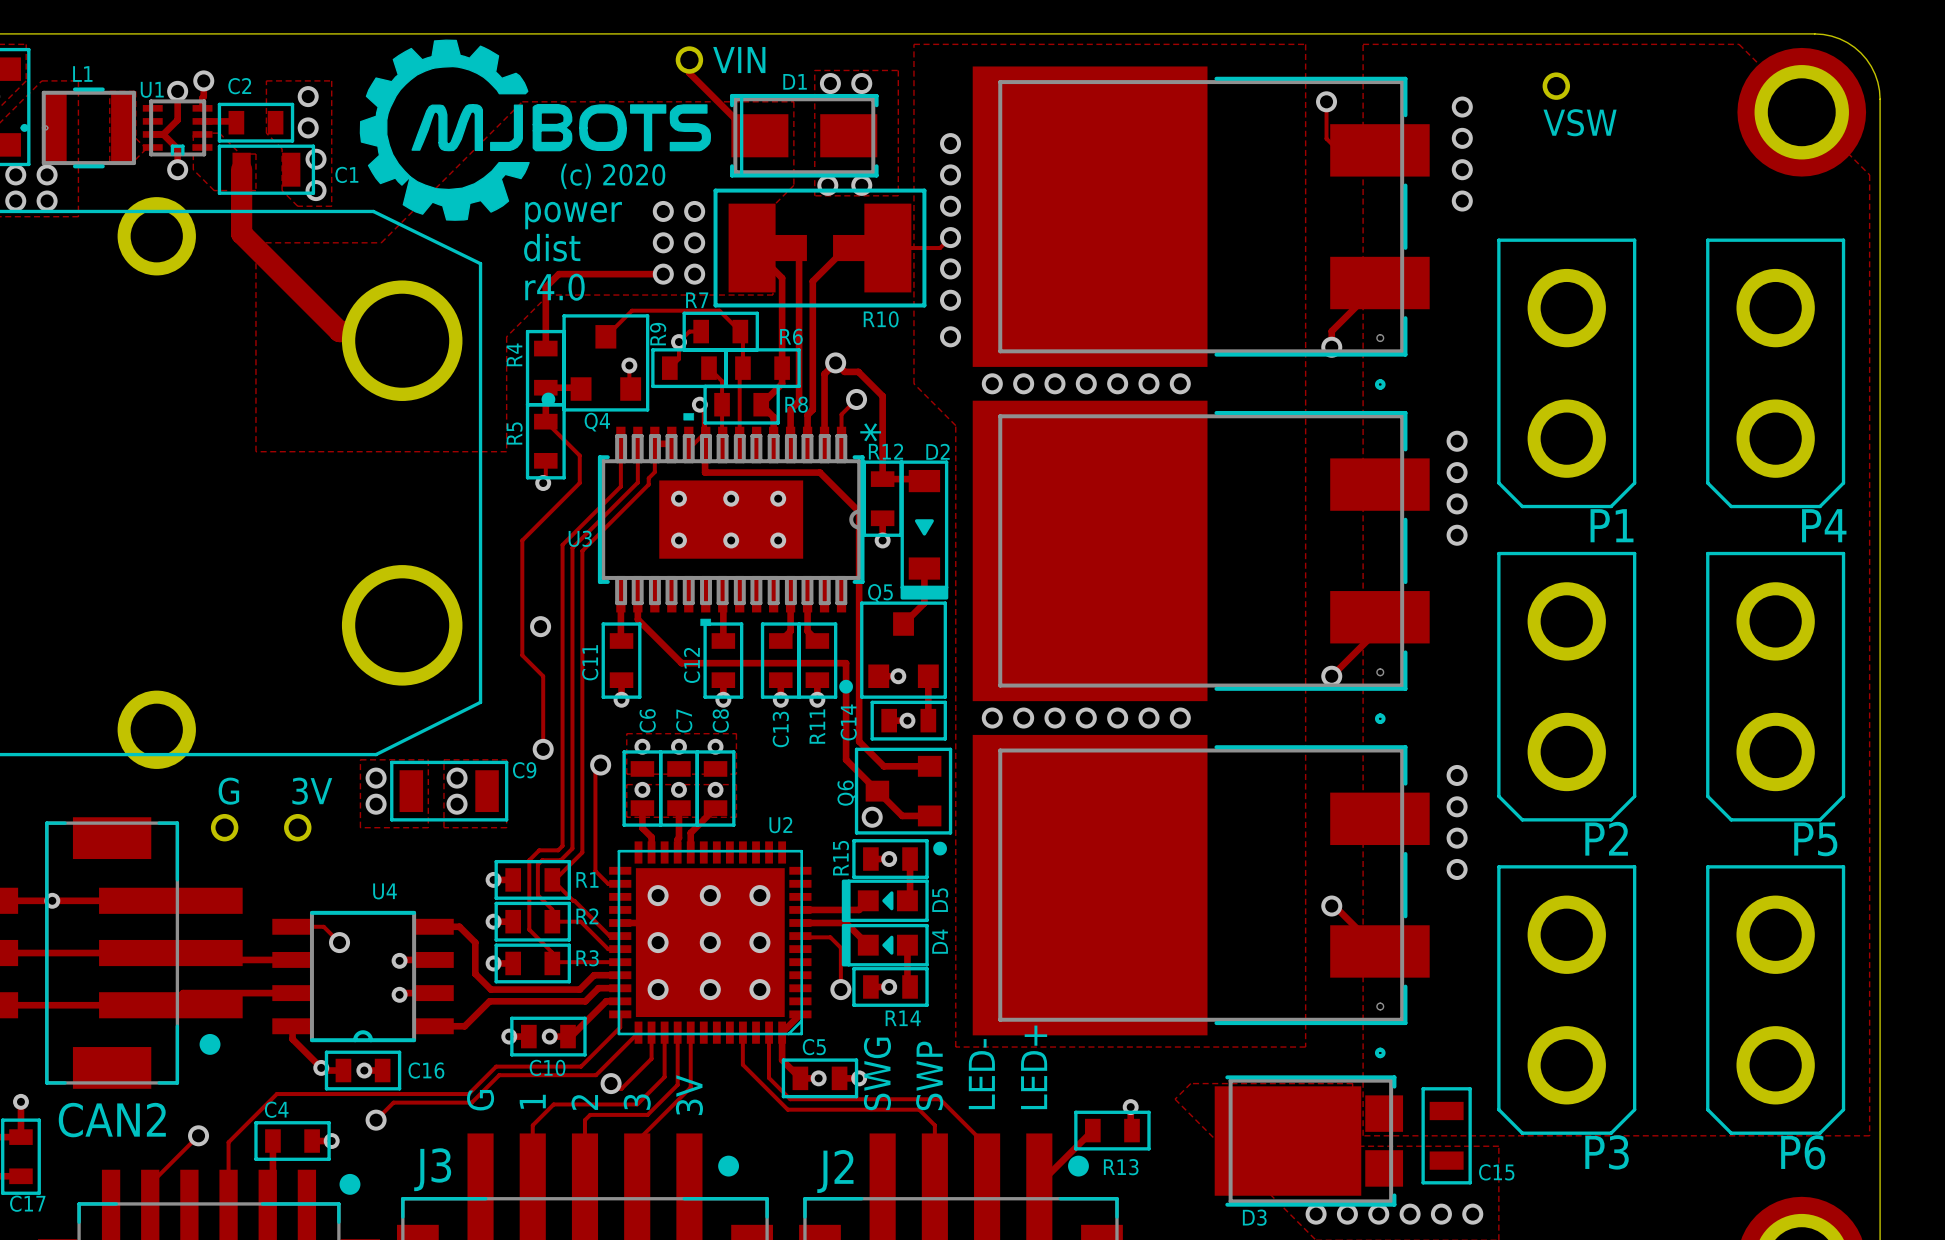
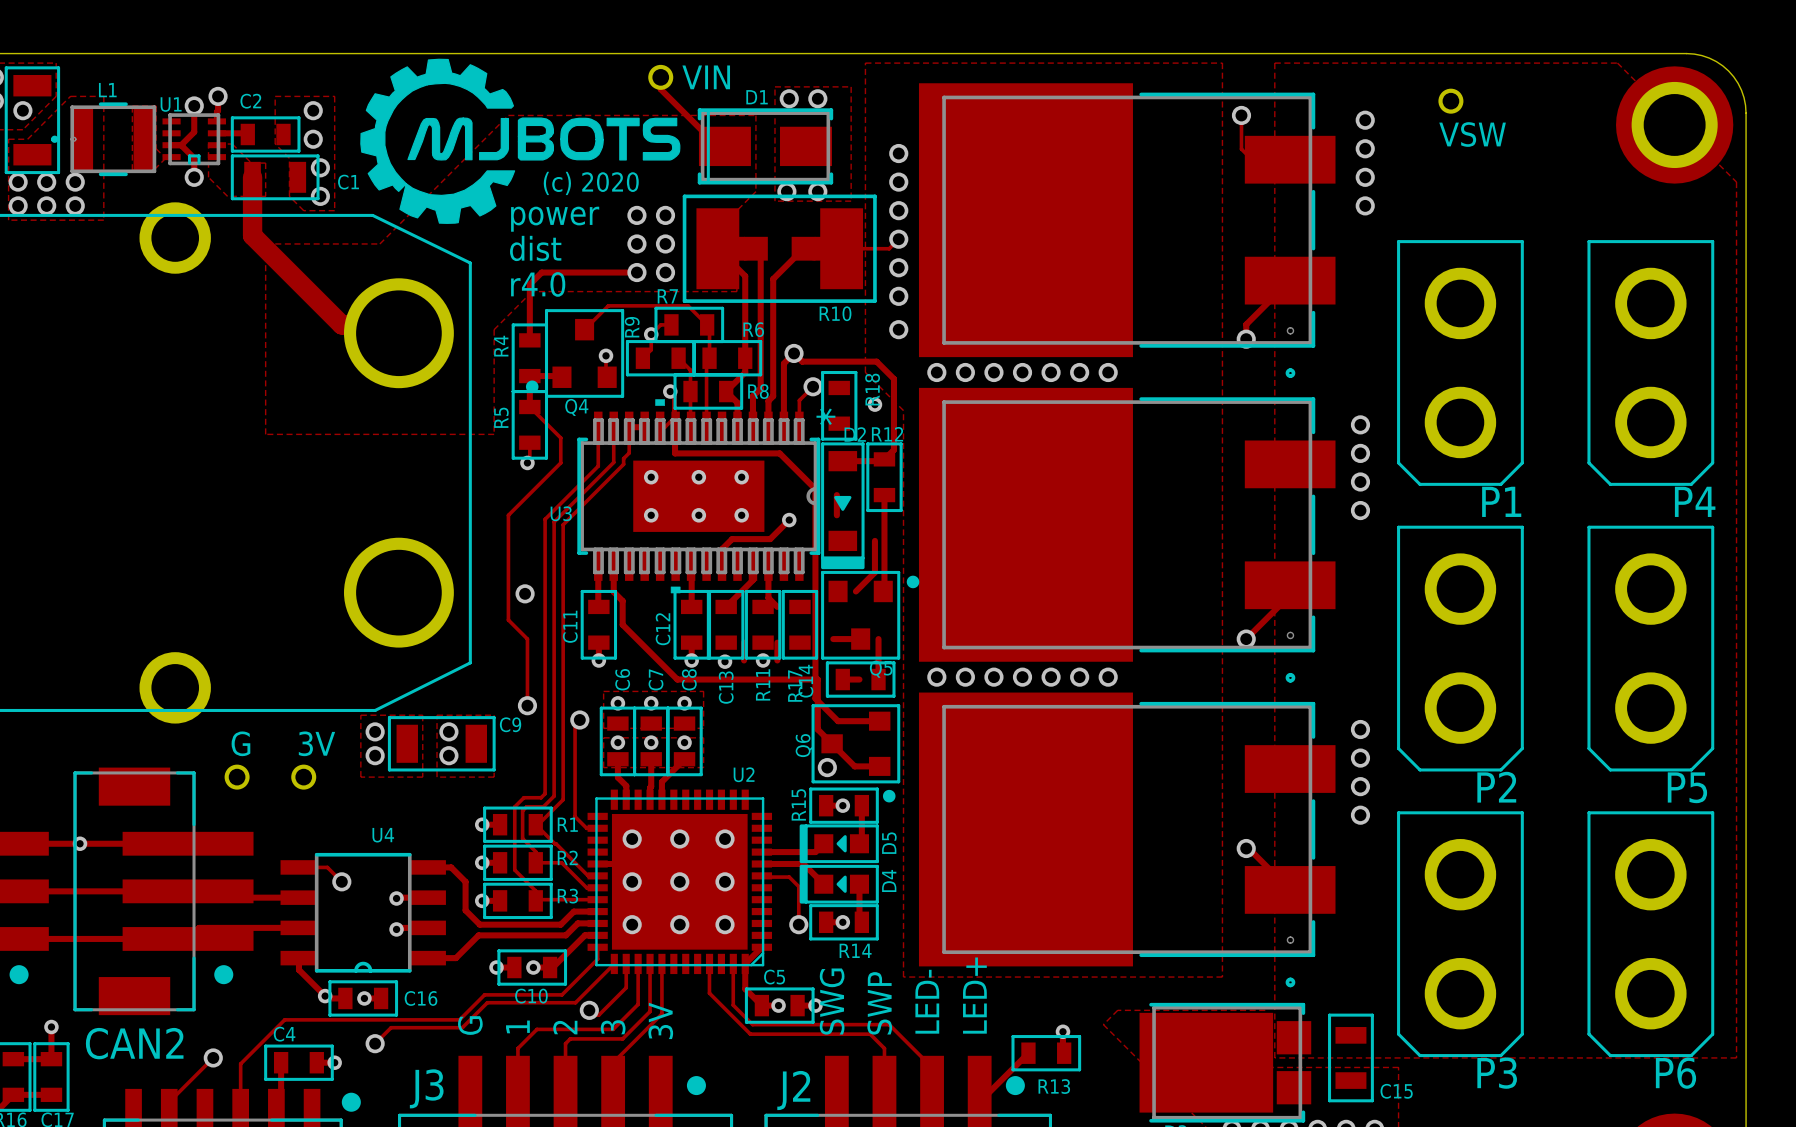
track: (858, 371) (882, 396) (882, 479) (922, 479) (924, 481) -> (814, 361) (876, 361) (893, 378) (893, 449) (882, 461) (842, 461)
via: none -> (874, 404)
R18: none -> (839, 405)
R12 position: (882, 498) -> (884, 477)
track: none -> (884, 495) (883, 591)
D2 position: (924, 530) -> (842, 505)
via position: (882, 540) -> (789, 520)
track: none -> (789, 520) (770, 539) (732, 539) (722, 549) (722, 565)
track: (790, 611) (790, 631) (780, 641) -> (752, 580) (726, 606)
track: (637, 619) (681, 663) (846, 663) (846, 759) (861, 775) -> (613, 587) (613, 592) (622, 600) (622, 624) (677, 679) (817, 679) (817, 729)
Q5 rotation: 0° (893, 650) -> 180° (870, 615)
C13 position: (780, 660) -> (726, 624)
R11 position: (817, 660) -> (763, 624)
R17: none -> (799, 624)
via: (898, 676) -> none
via: (780, 699) -> none
via position: (817, 699) -> (763, 660)
via: none -> (725, 661)
via: (907, 720) -> none

